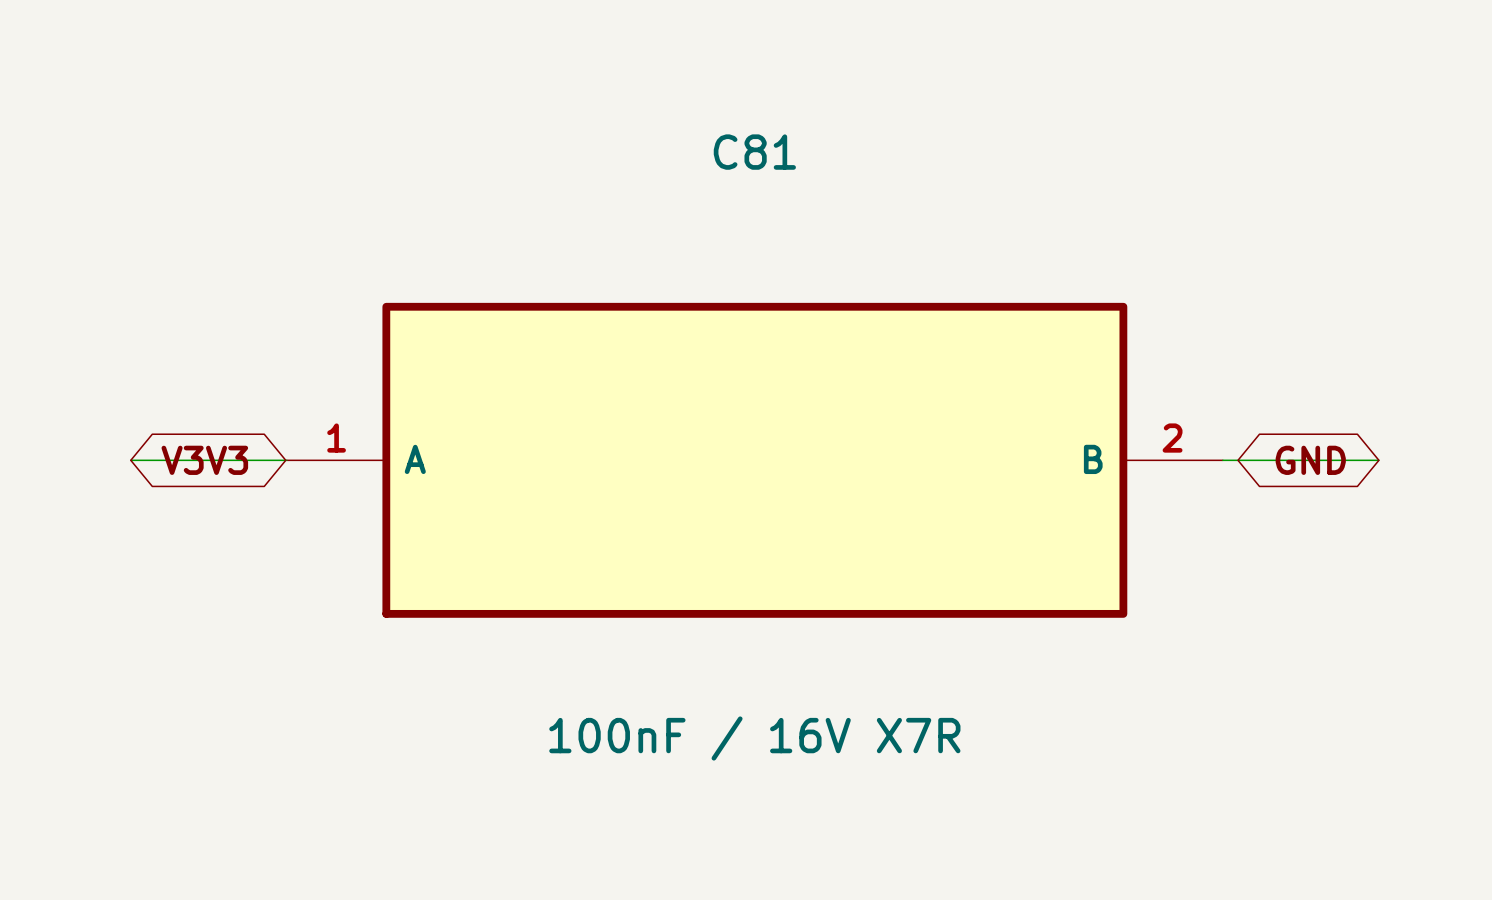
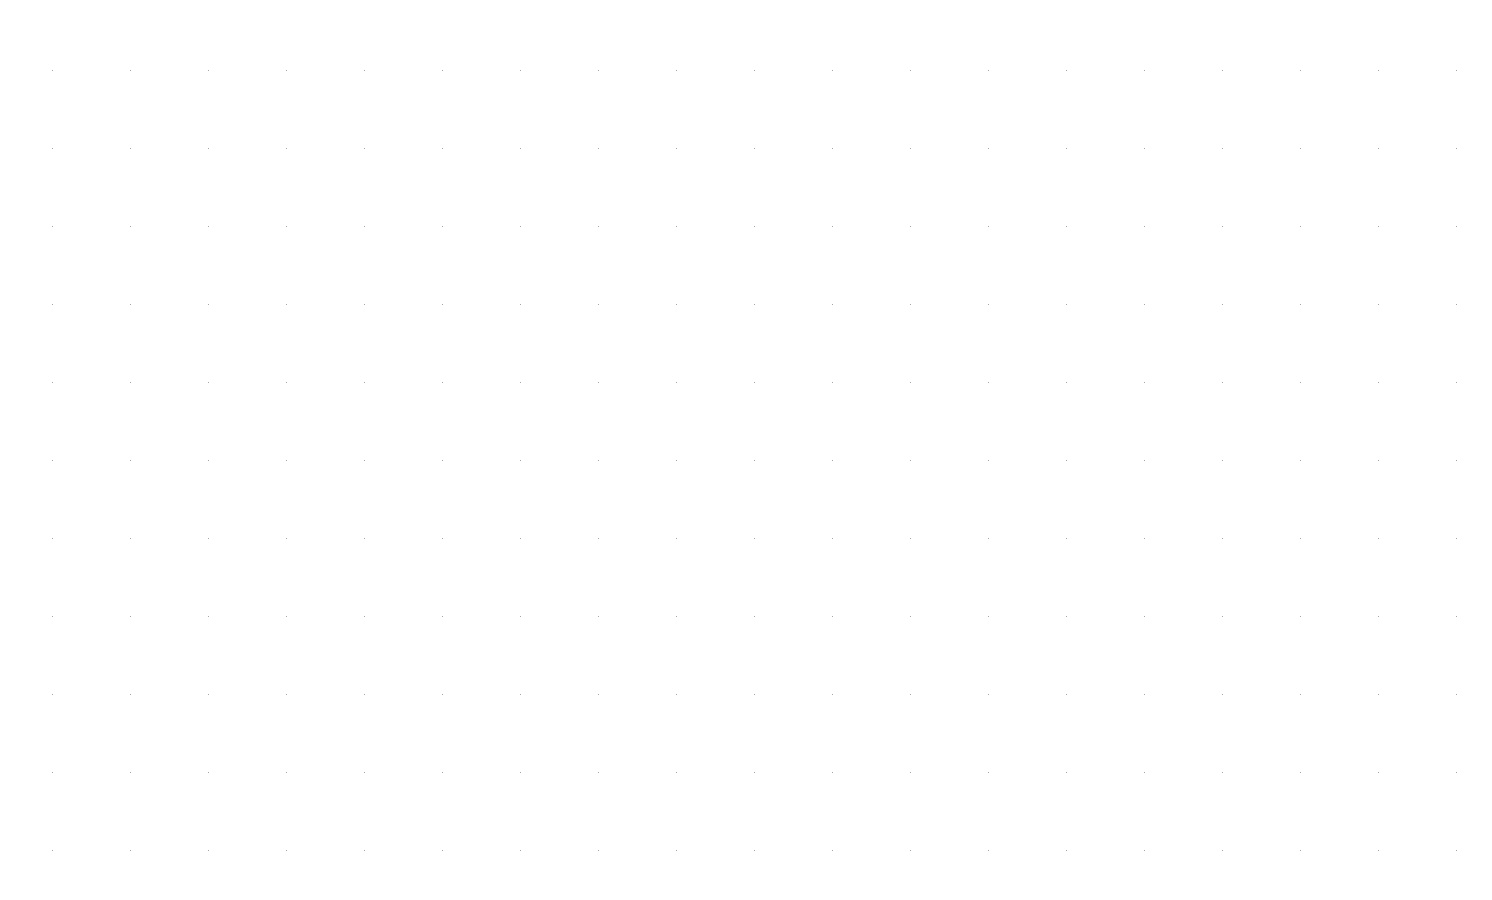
wire: (130, 460) (286, 460) -> none
global label: V3V3 (204, 460) -> none
C81: 100nF / 16V X7R (754, 460) -> none
wire: (1222, 460) (1378, 460) -> none
global label: GND (1310, 460) -> none

